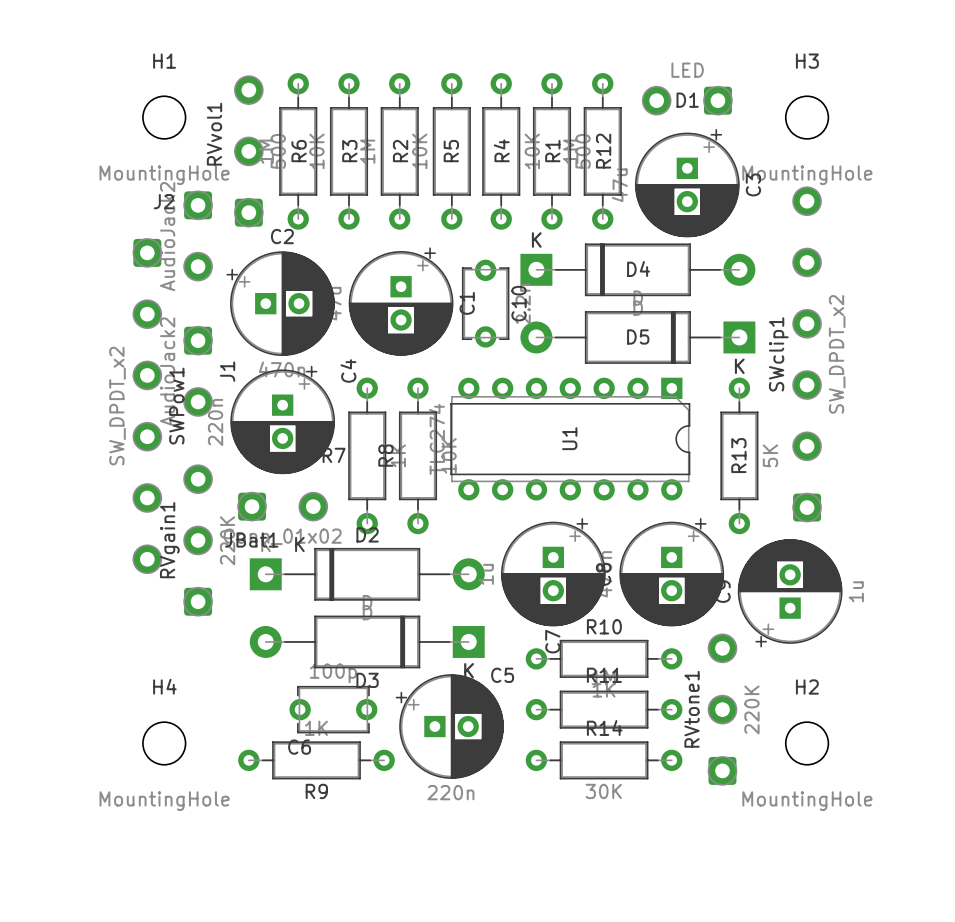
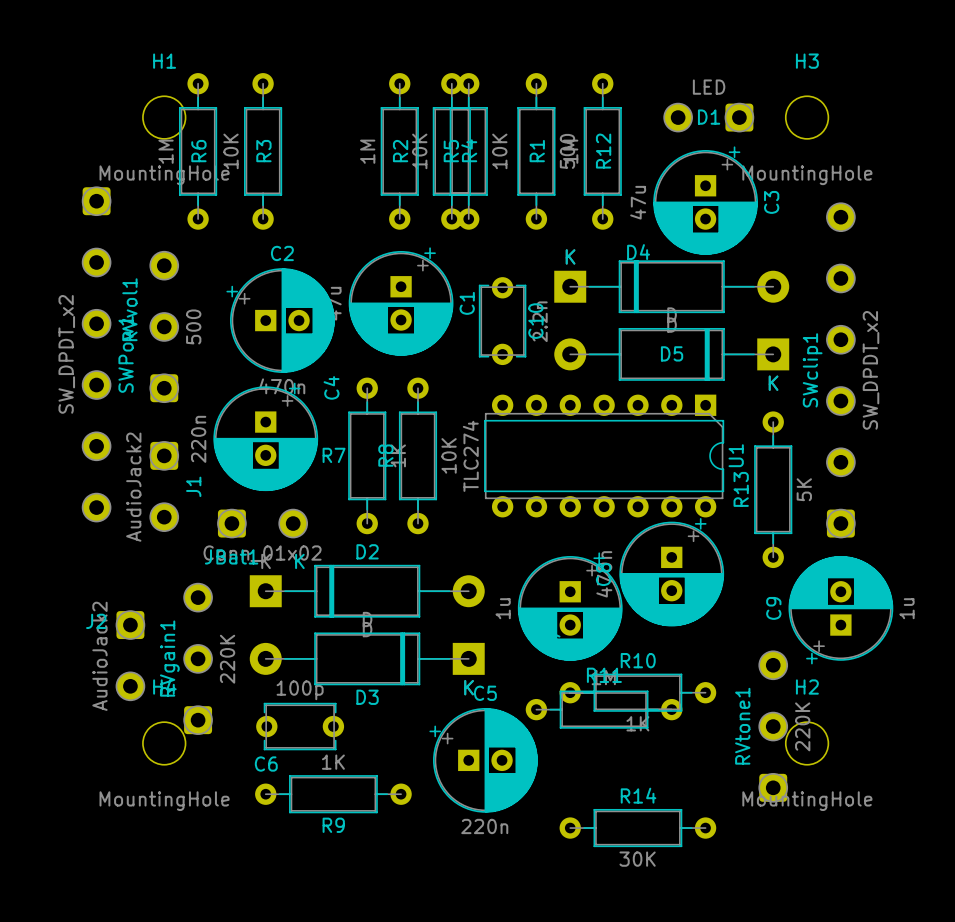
D1 position: (687, 100) -> (708, 117)
RVvol1 position: (248, 151) -> (164, 326)
R6 position: (298, 151) -> (198, 151)
R3 position: (349, 151) -> (263, 151)
R4 position: (501, 151) -> (468, 151)
R1 position: (551, 151) -> (536, 151)
C3 position: (687, 183) -> (705, 200)
J2 position: (198, 235) -> (130, 655)
D4 position: (637, 269) -> (671, 286)
D4 name position: D4 (638, 269) -> D4 (638, 252)
C2 position: (280, 303) -> (280, 320)
C10 position: (485, 303) -> (502, 321)
D5 position: (637, 337) -> (671, 354)
SWclip1 position: (807, 354) -> (840, 370)
J1 position: (198, 371) -> (164, 486)
SWPow1 position: (147, 406) -> (96, 354)
C4 position: (282, 419) -> (265, 436)
U1 name position: U1 (569, 438) -> U1 (736, 455)
U1 position: (570, 439) -> (604, 456)
R13 name position: R13 (738, 455) -> R13 (741, 489)
R13 position: (739, 455) -> (773, 489)
JBat1 position: (282, 506) -> (262, 523)
RVgain1 position: (198, 540) -> (198, 658)
C7 position: (553, 572) -> (570, 606)
D2 position: (367, 574) -> (367, 591)
C9 position: (790, 593) -> (840, 610)
D3 position: (367, 641) -> (367, 658)
R10 position: (604, 658) -> (637, 692)
C5 name position: C5 (502, 675) -> C5 (485, 693)
C6 position: (333, 709) -> (300, 726)
RVtone1 position: (722, 709) -> (773, 726)
C5 position: (449, 726) -> (483, 760)
R9 position: (316, 760) -> (333, 794)
R14 position: (604, 760) -> (637, 828)

